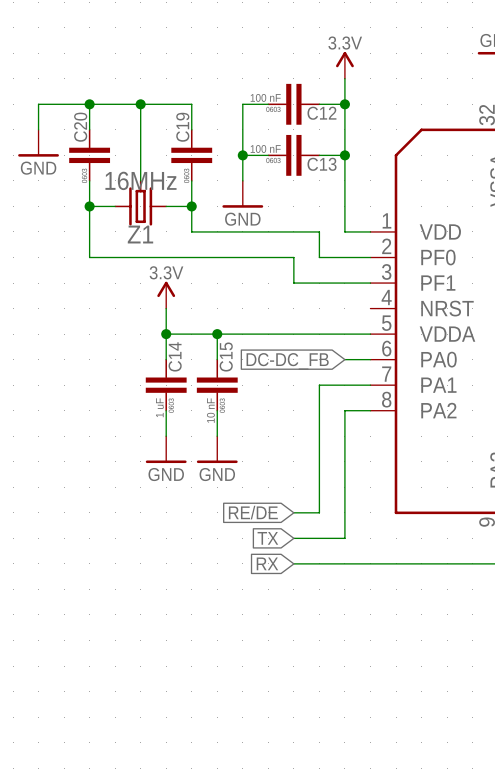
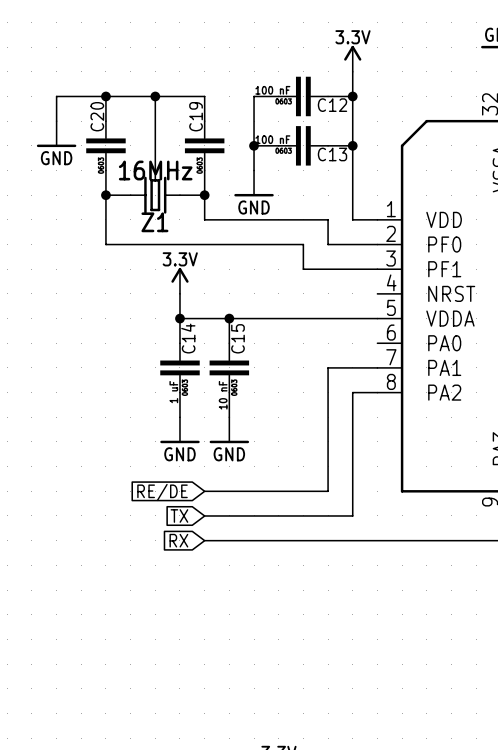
wire: (344, 359) (370, 359) -> none
global label: DC-DC_FB (287, 361) -> none
wire: none -> (204, 491) (303, 491)
global label position: RE/DE (253, 512) -> RE/DE (162, 492)
wire: none -> (204, 515) (303, 515)
global label position: TX (267, 538) -> TX (179, 515)
wire: none -> (204, 540) (303, 540)
global label position: RX (267, 563) -> RX (178, 540)

